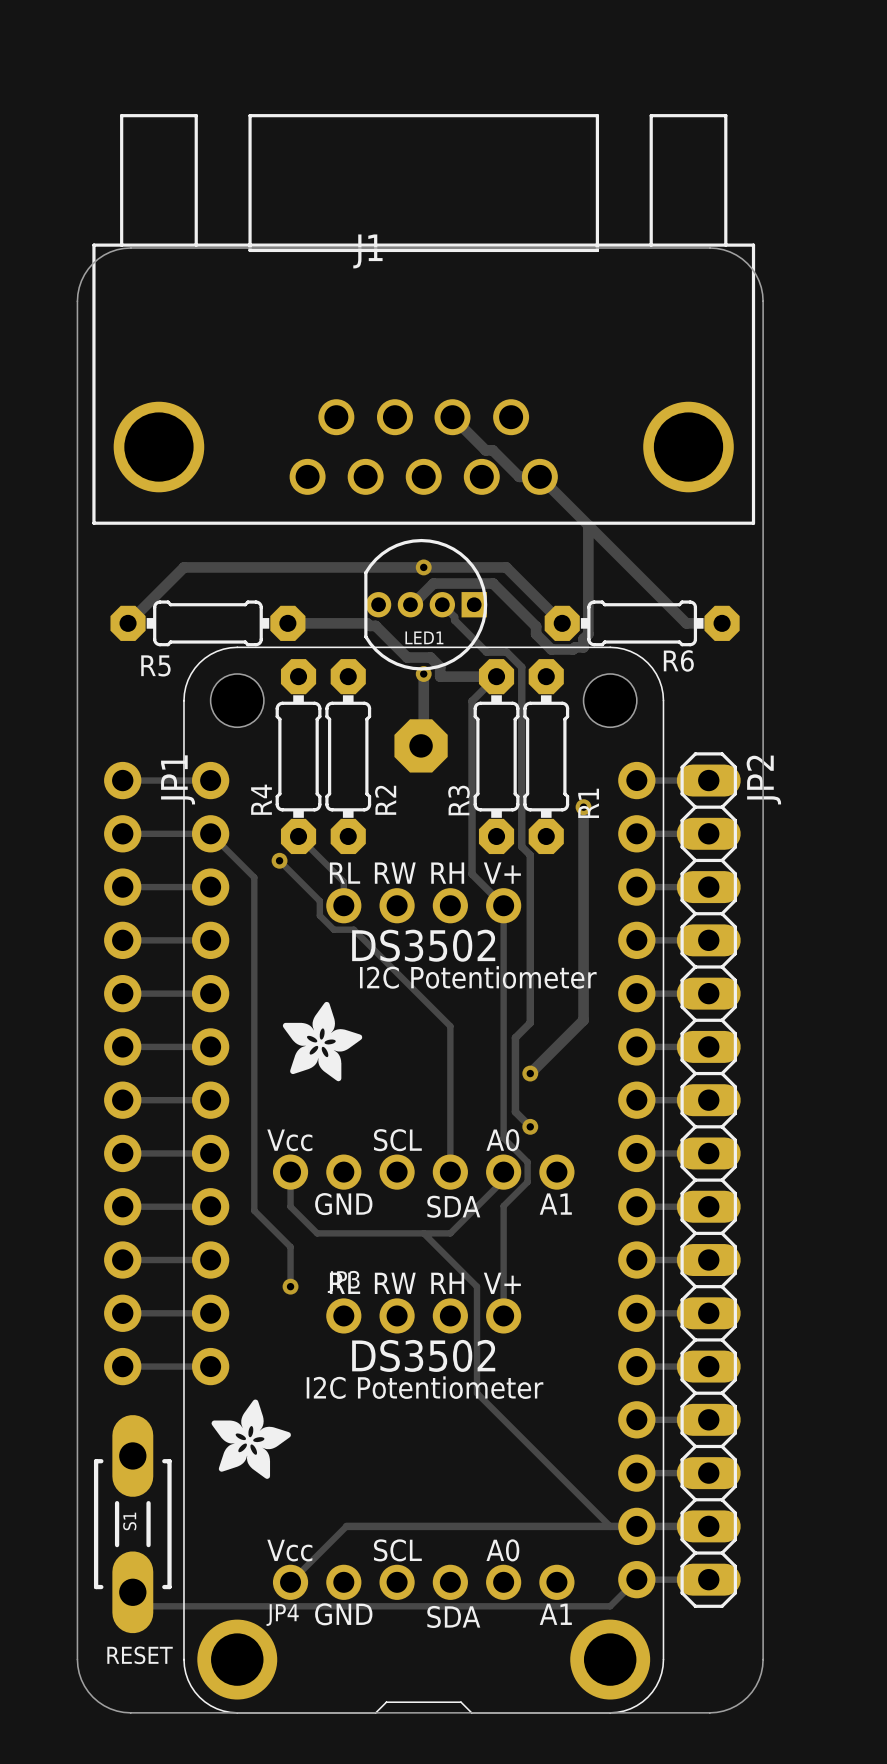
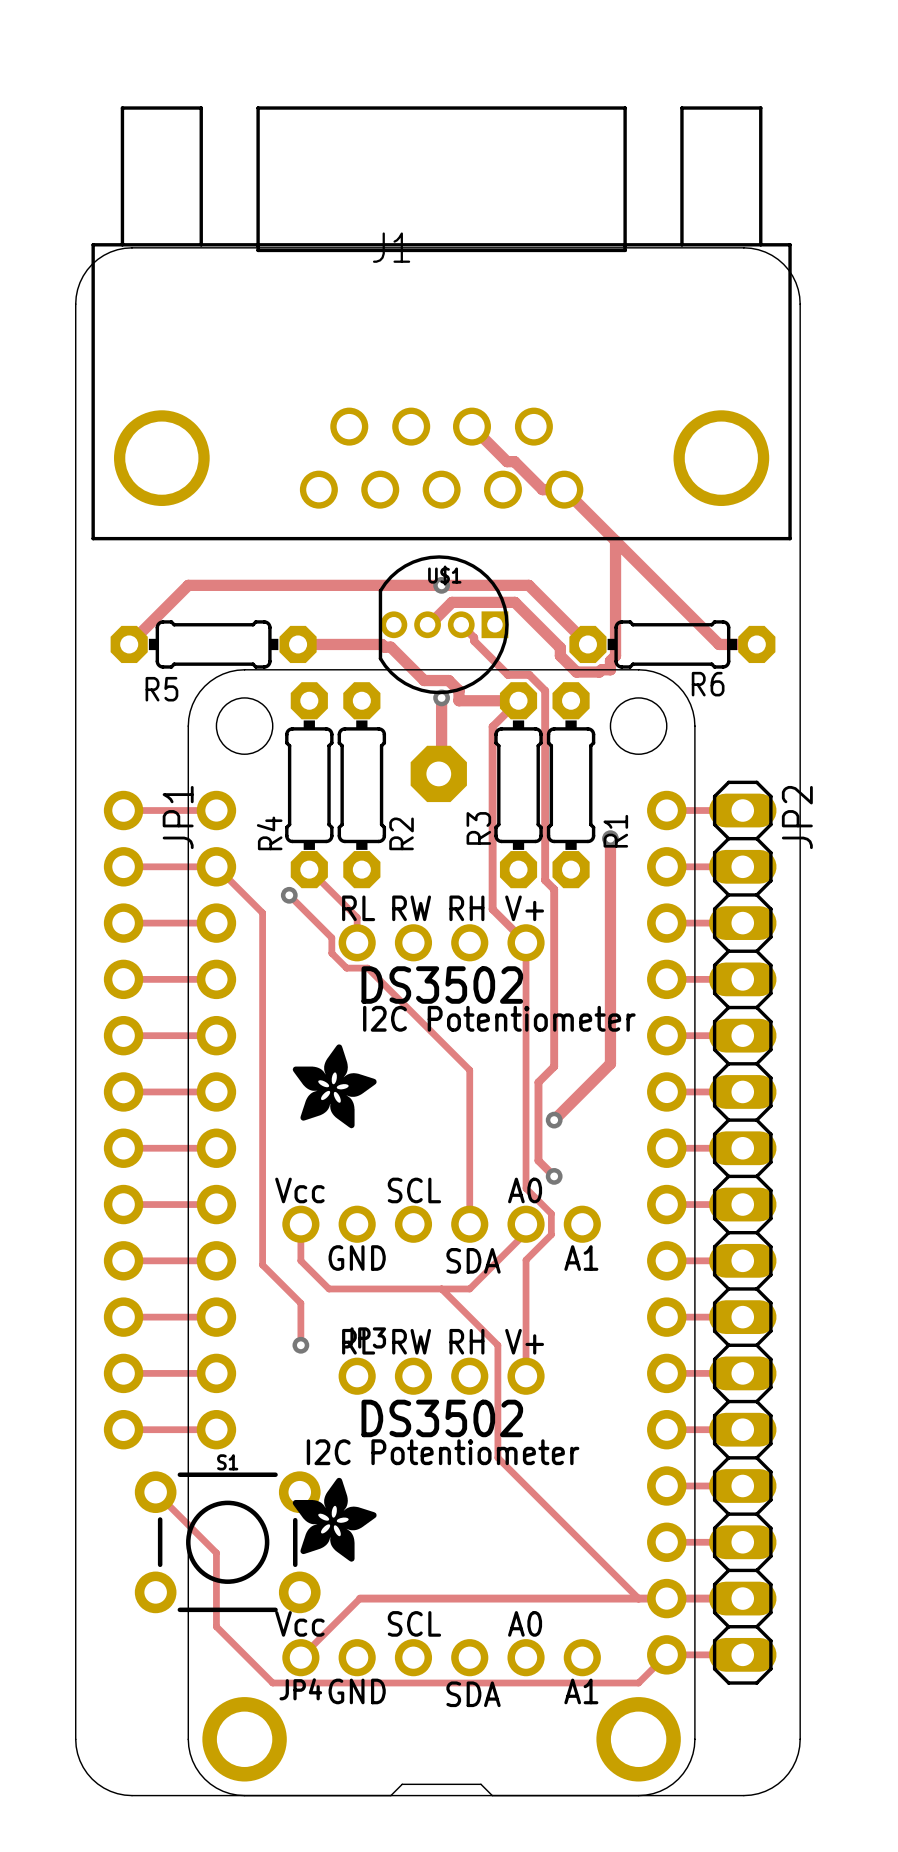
LED1 name: LED1 (424, 637) -> U$1 (444, 575)
S1 footprint: [93, 1415, 172, 1634] -> [134, 1471, 321, 1614]
drawing position: (251, 1439) -> (334, 1519)
S1 name position: S1 (129, 1521) -> S1 (227, 1462)
track: (132, 1592) (146, 1606) (263, 1606) -> (155, 1492) (216, 1552) (216, 1626) (272, 1683)
S1 value: RESET (140, 1655) -> none

